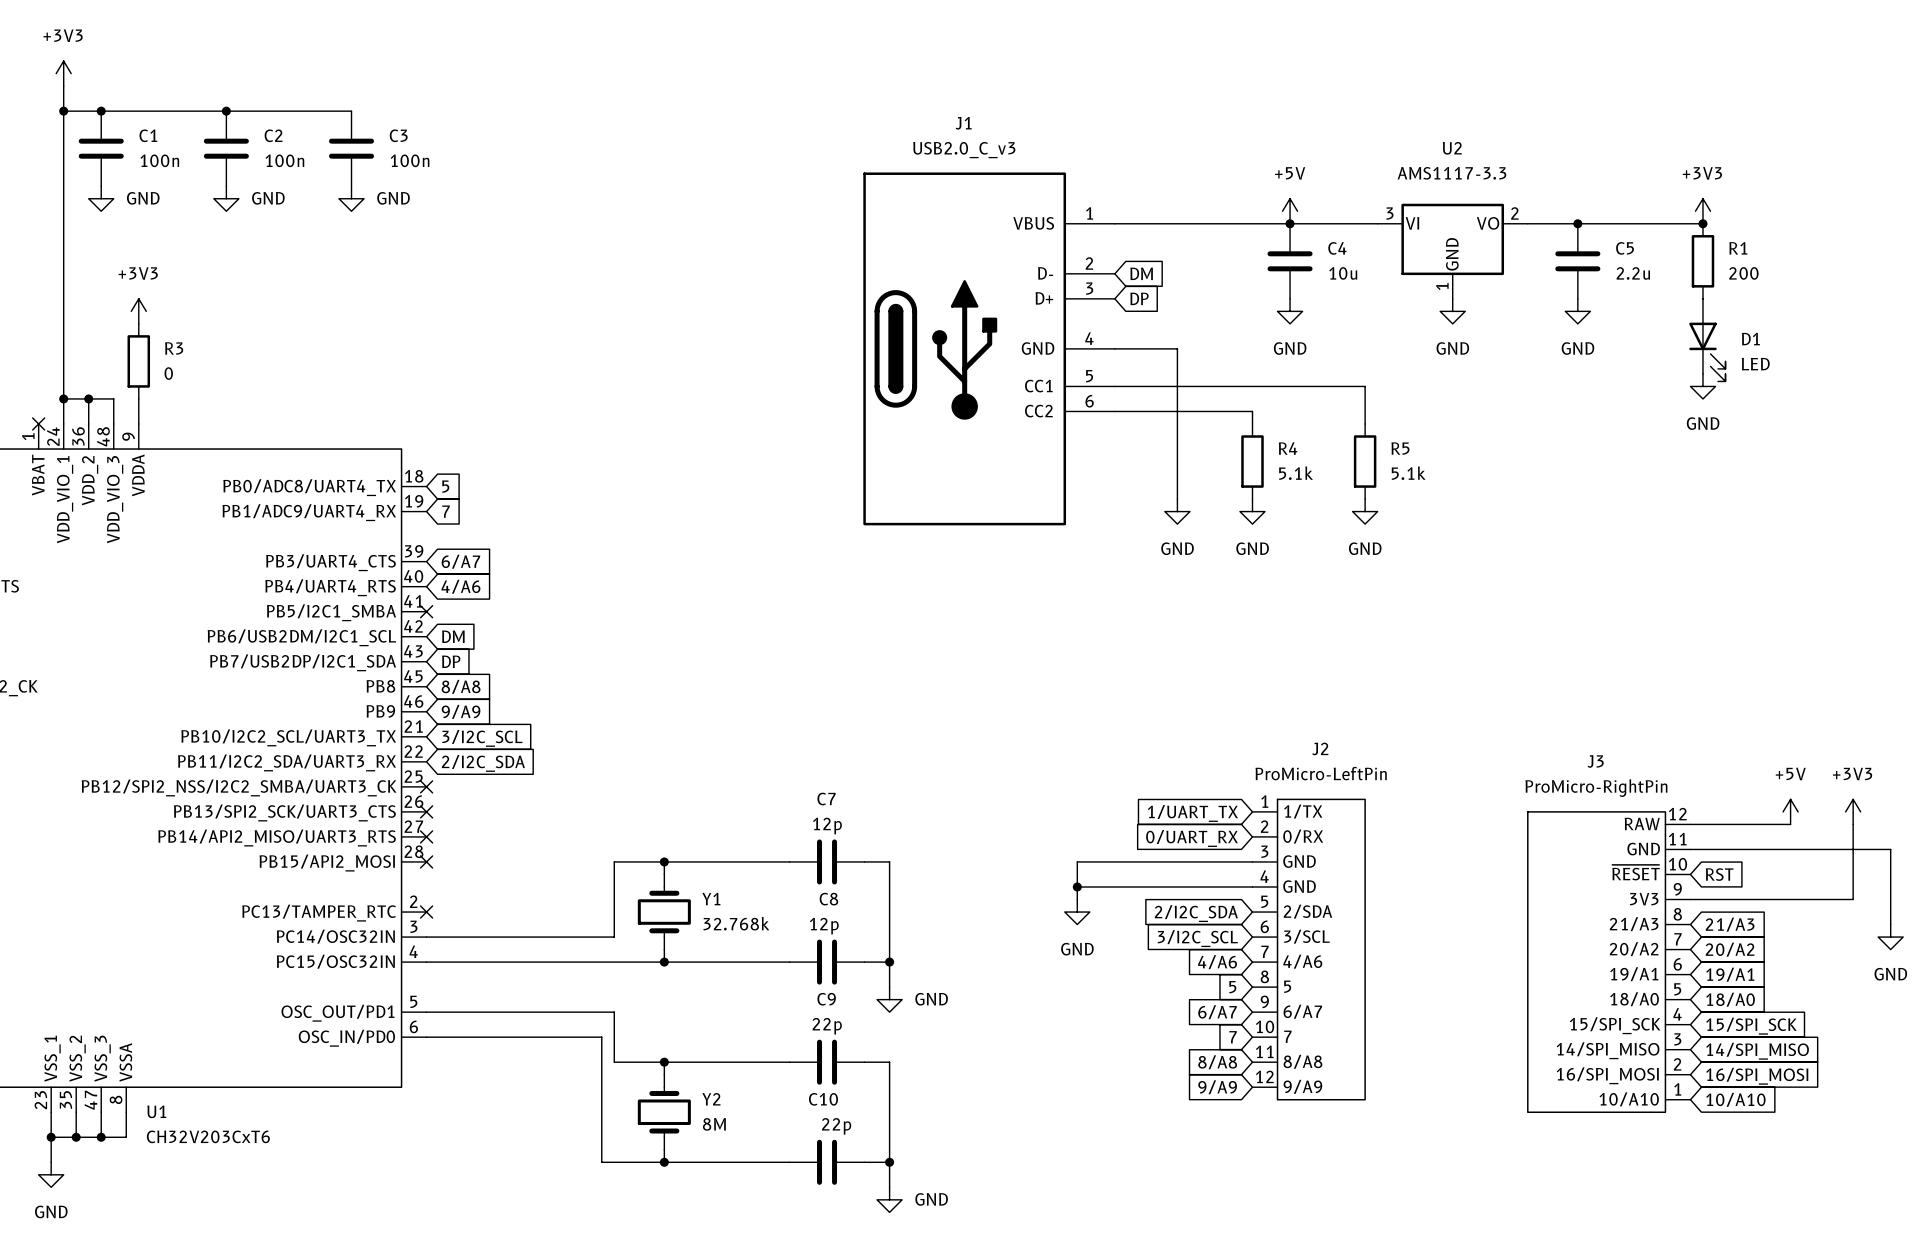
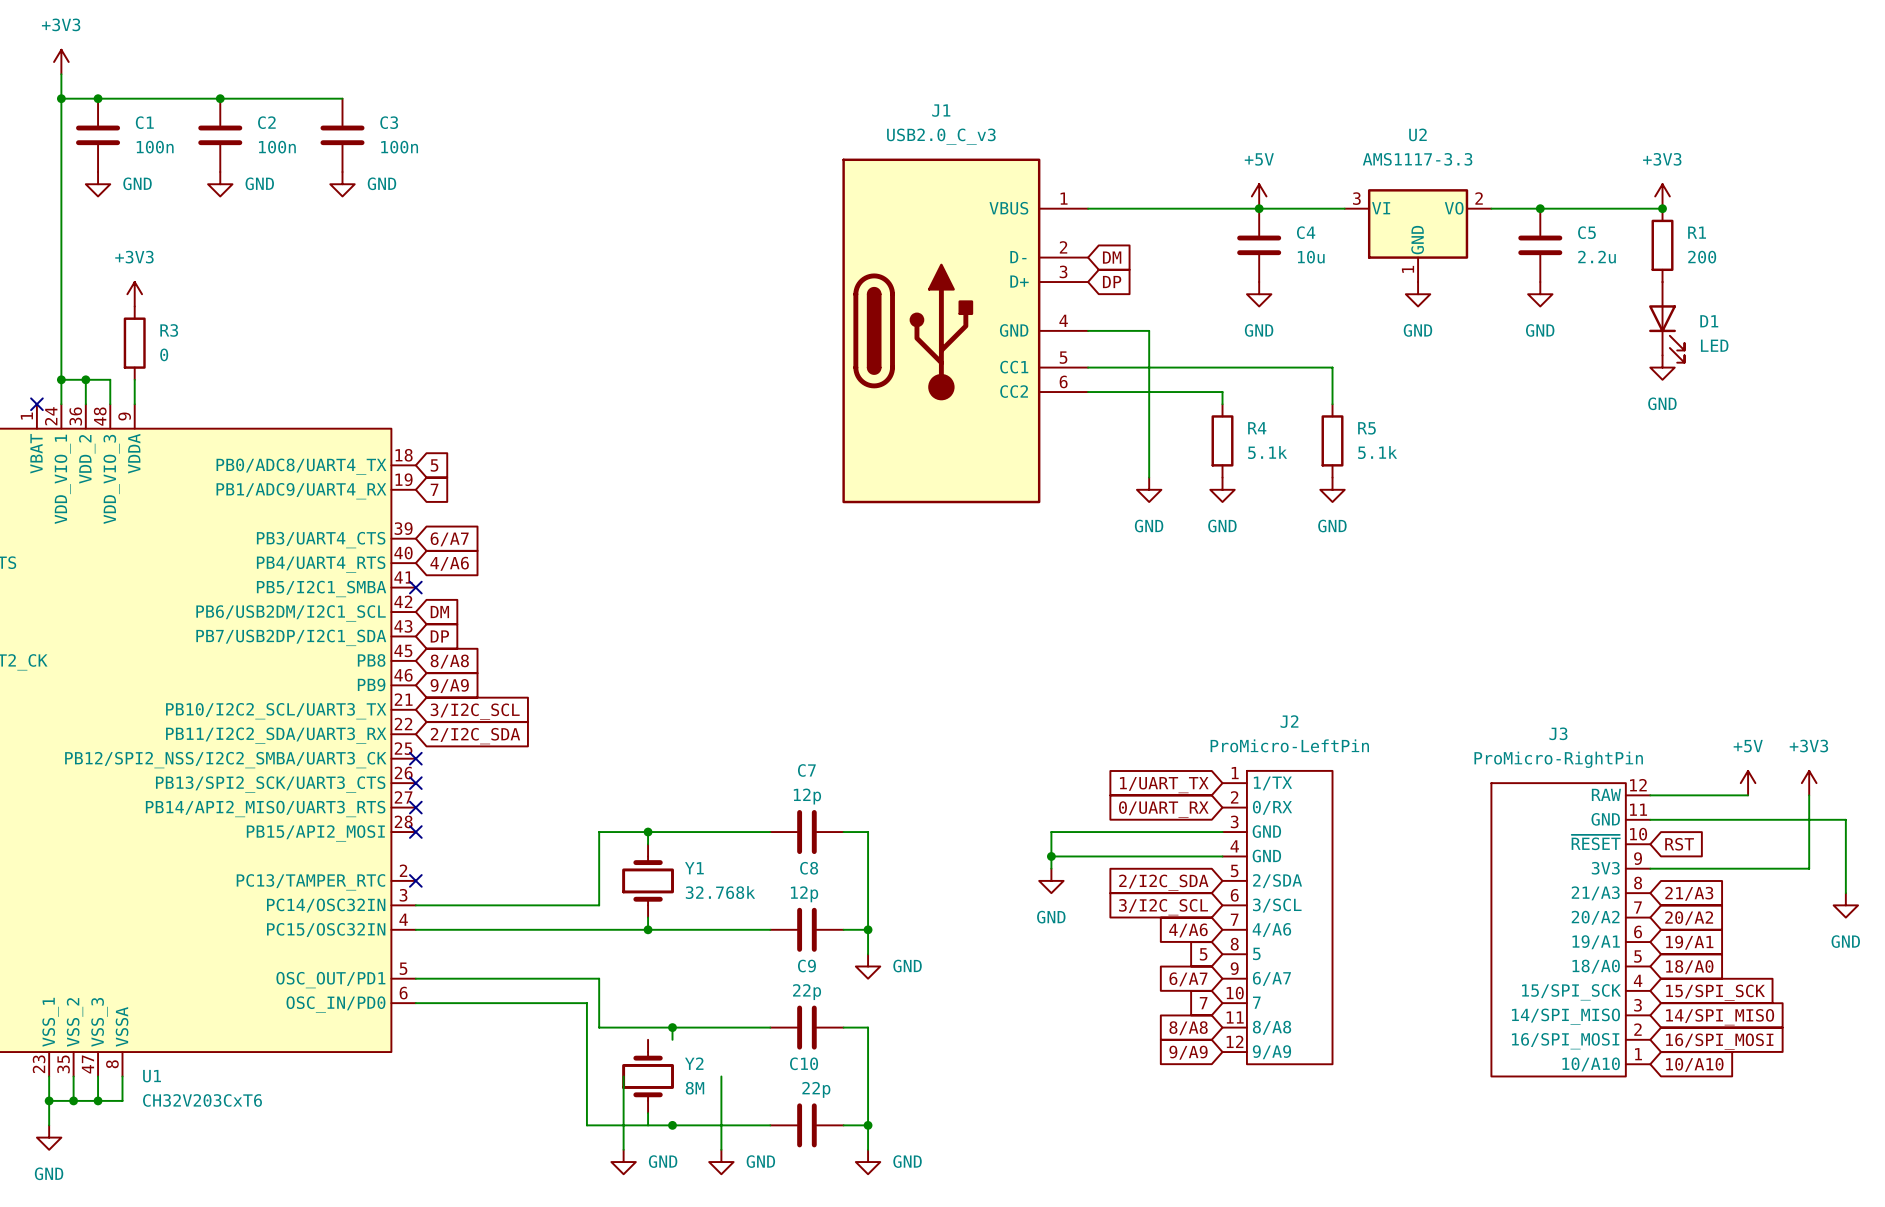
wire: (664, 1062) (664, 1074) -> (672, 1027) (672, 1039)
junction position: (664, 1062) -> (672, 1027)
wire: none -> (623, 1076) (623, 1149)
wire: none -> (721, 1076) (721, 1149)
junction position: (664, 1162) -> (672, 1125)
power symbol: none -> GND (623, 1162)
power symbol: none -> GND (721, 1162)

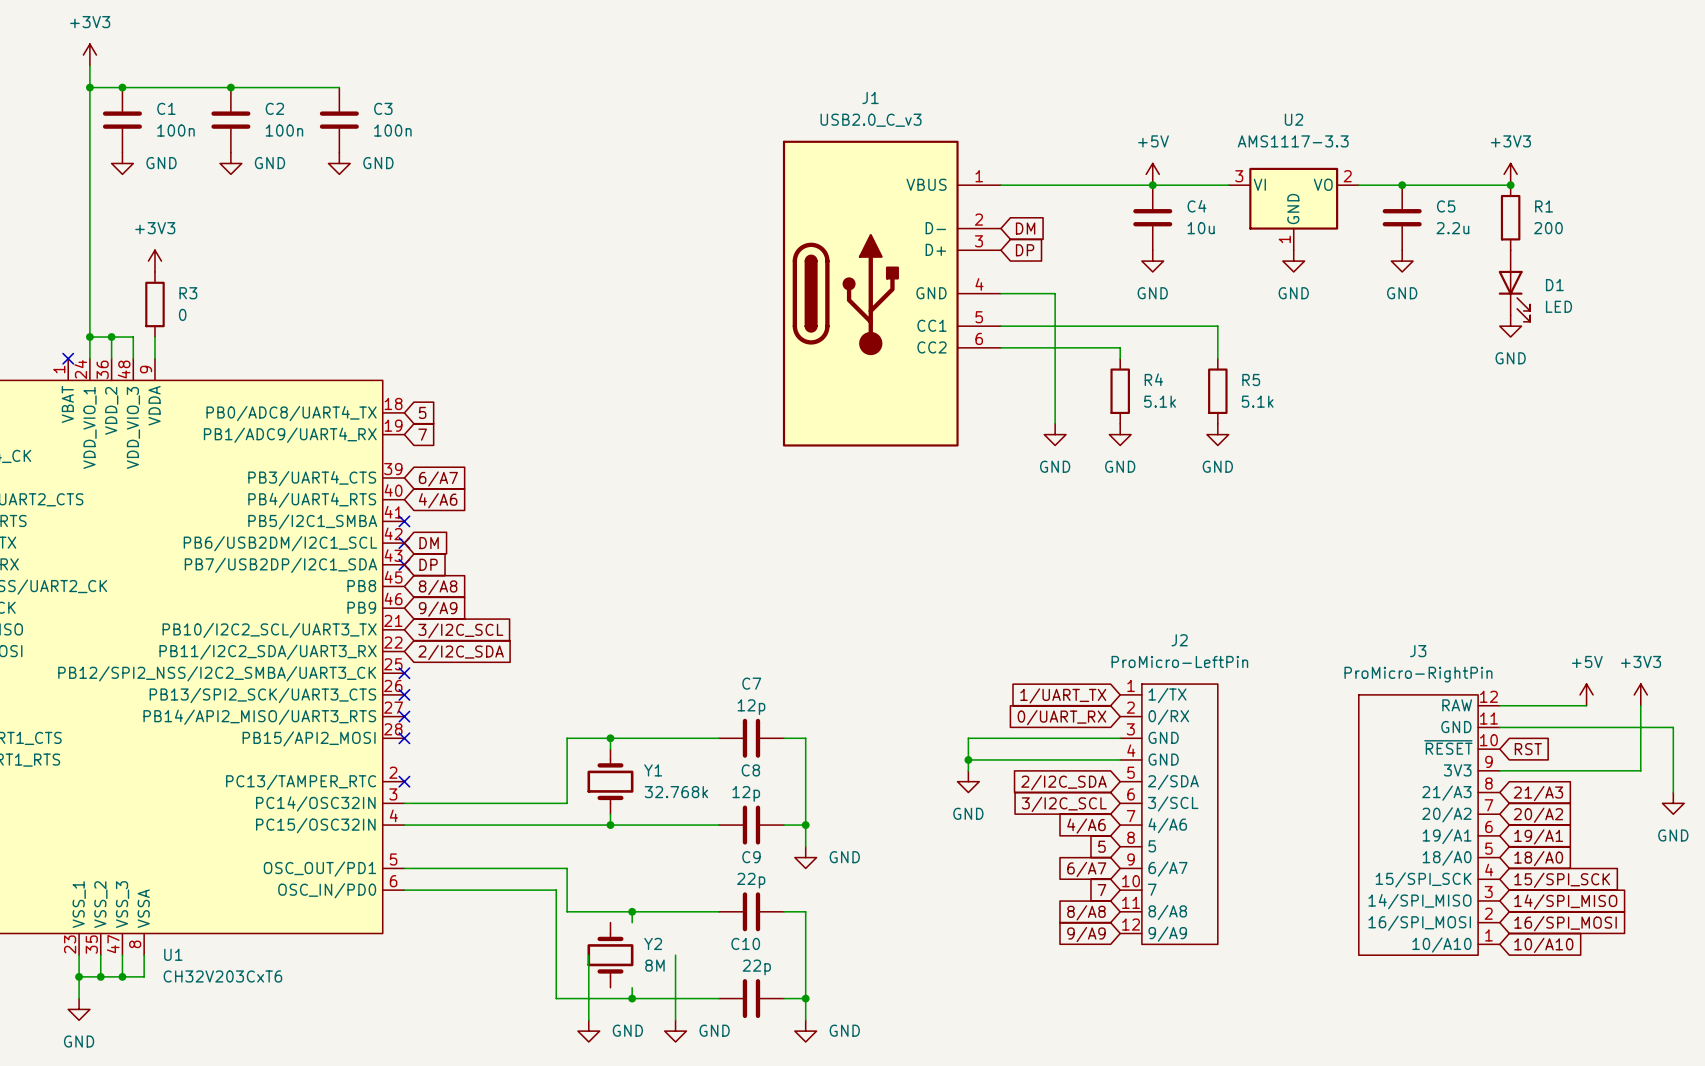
no-connect mark: none -> (404, 543)
no-connect mark: none -> (404, 564)
wire: (648, 1113) (648, 1125) -> (632, 987) (632, 998)

